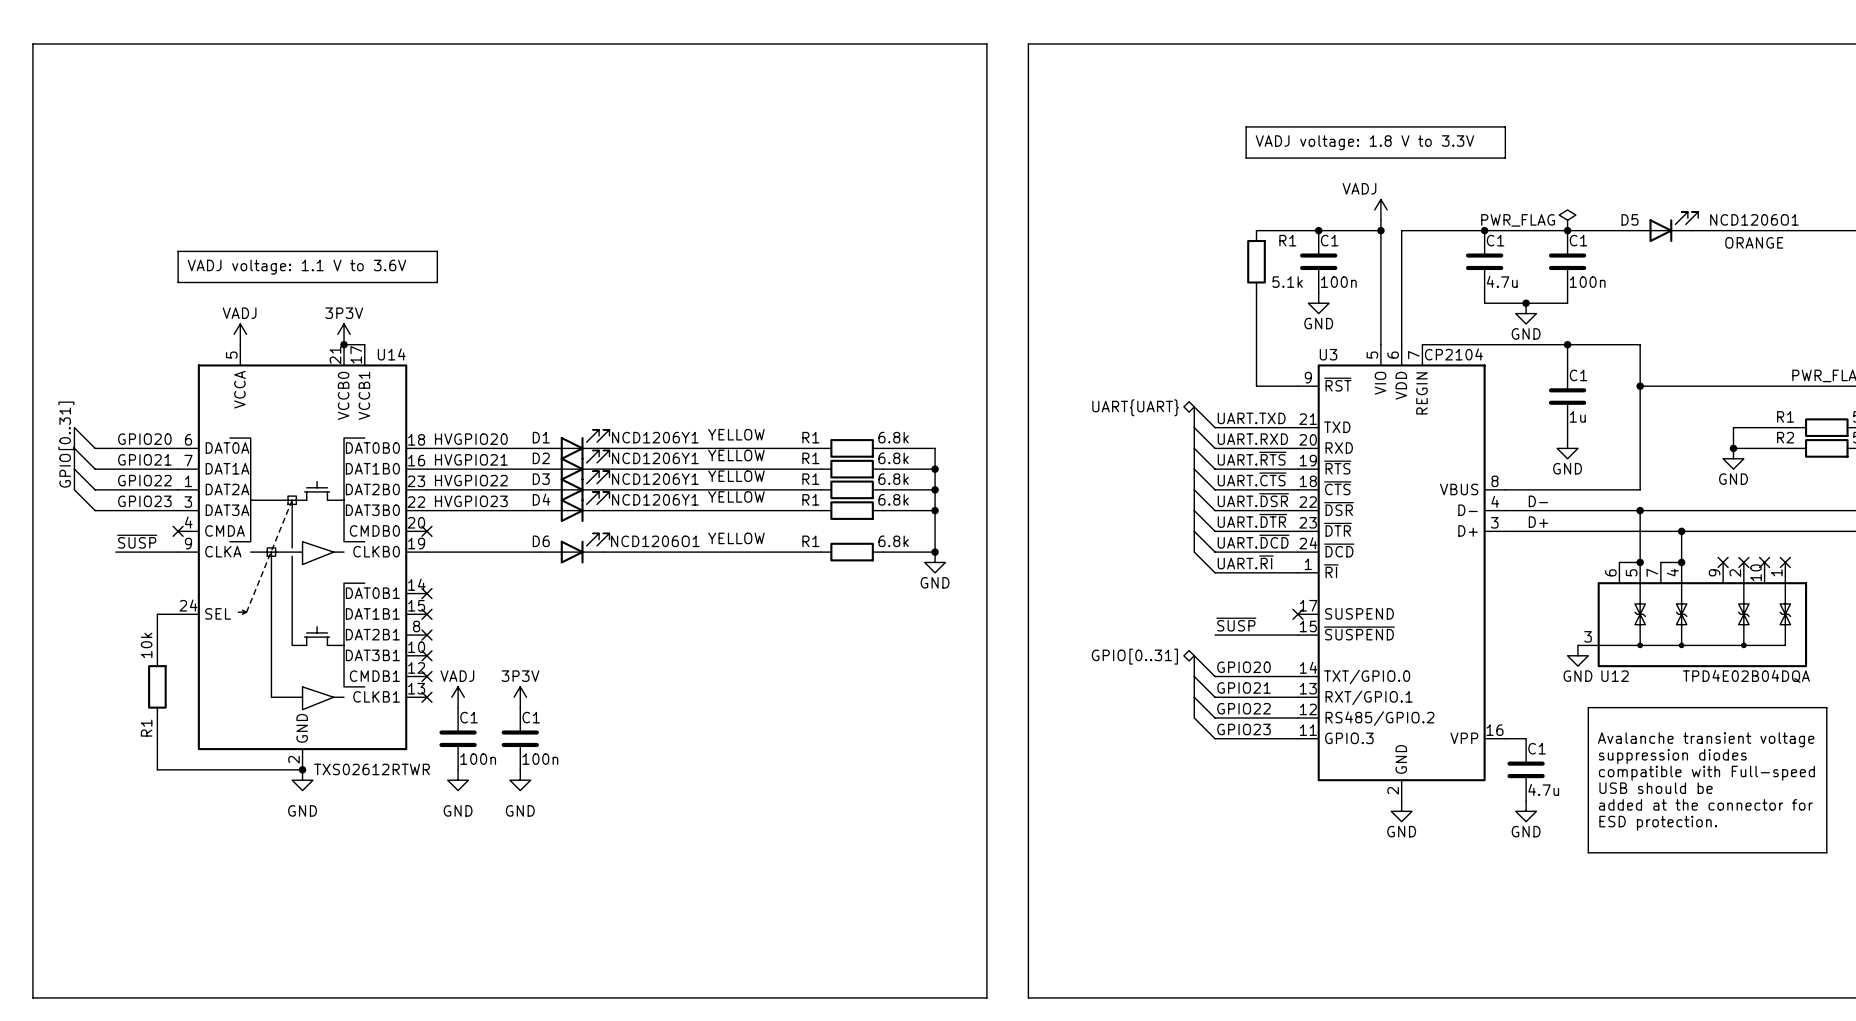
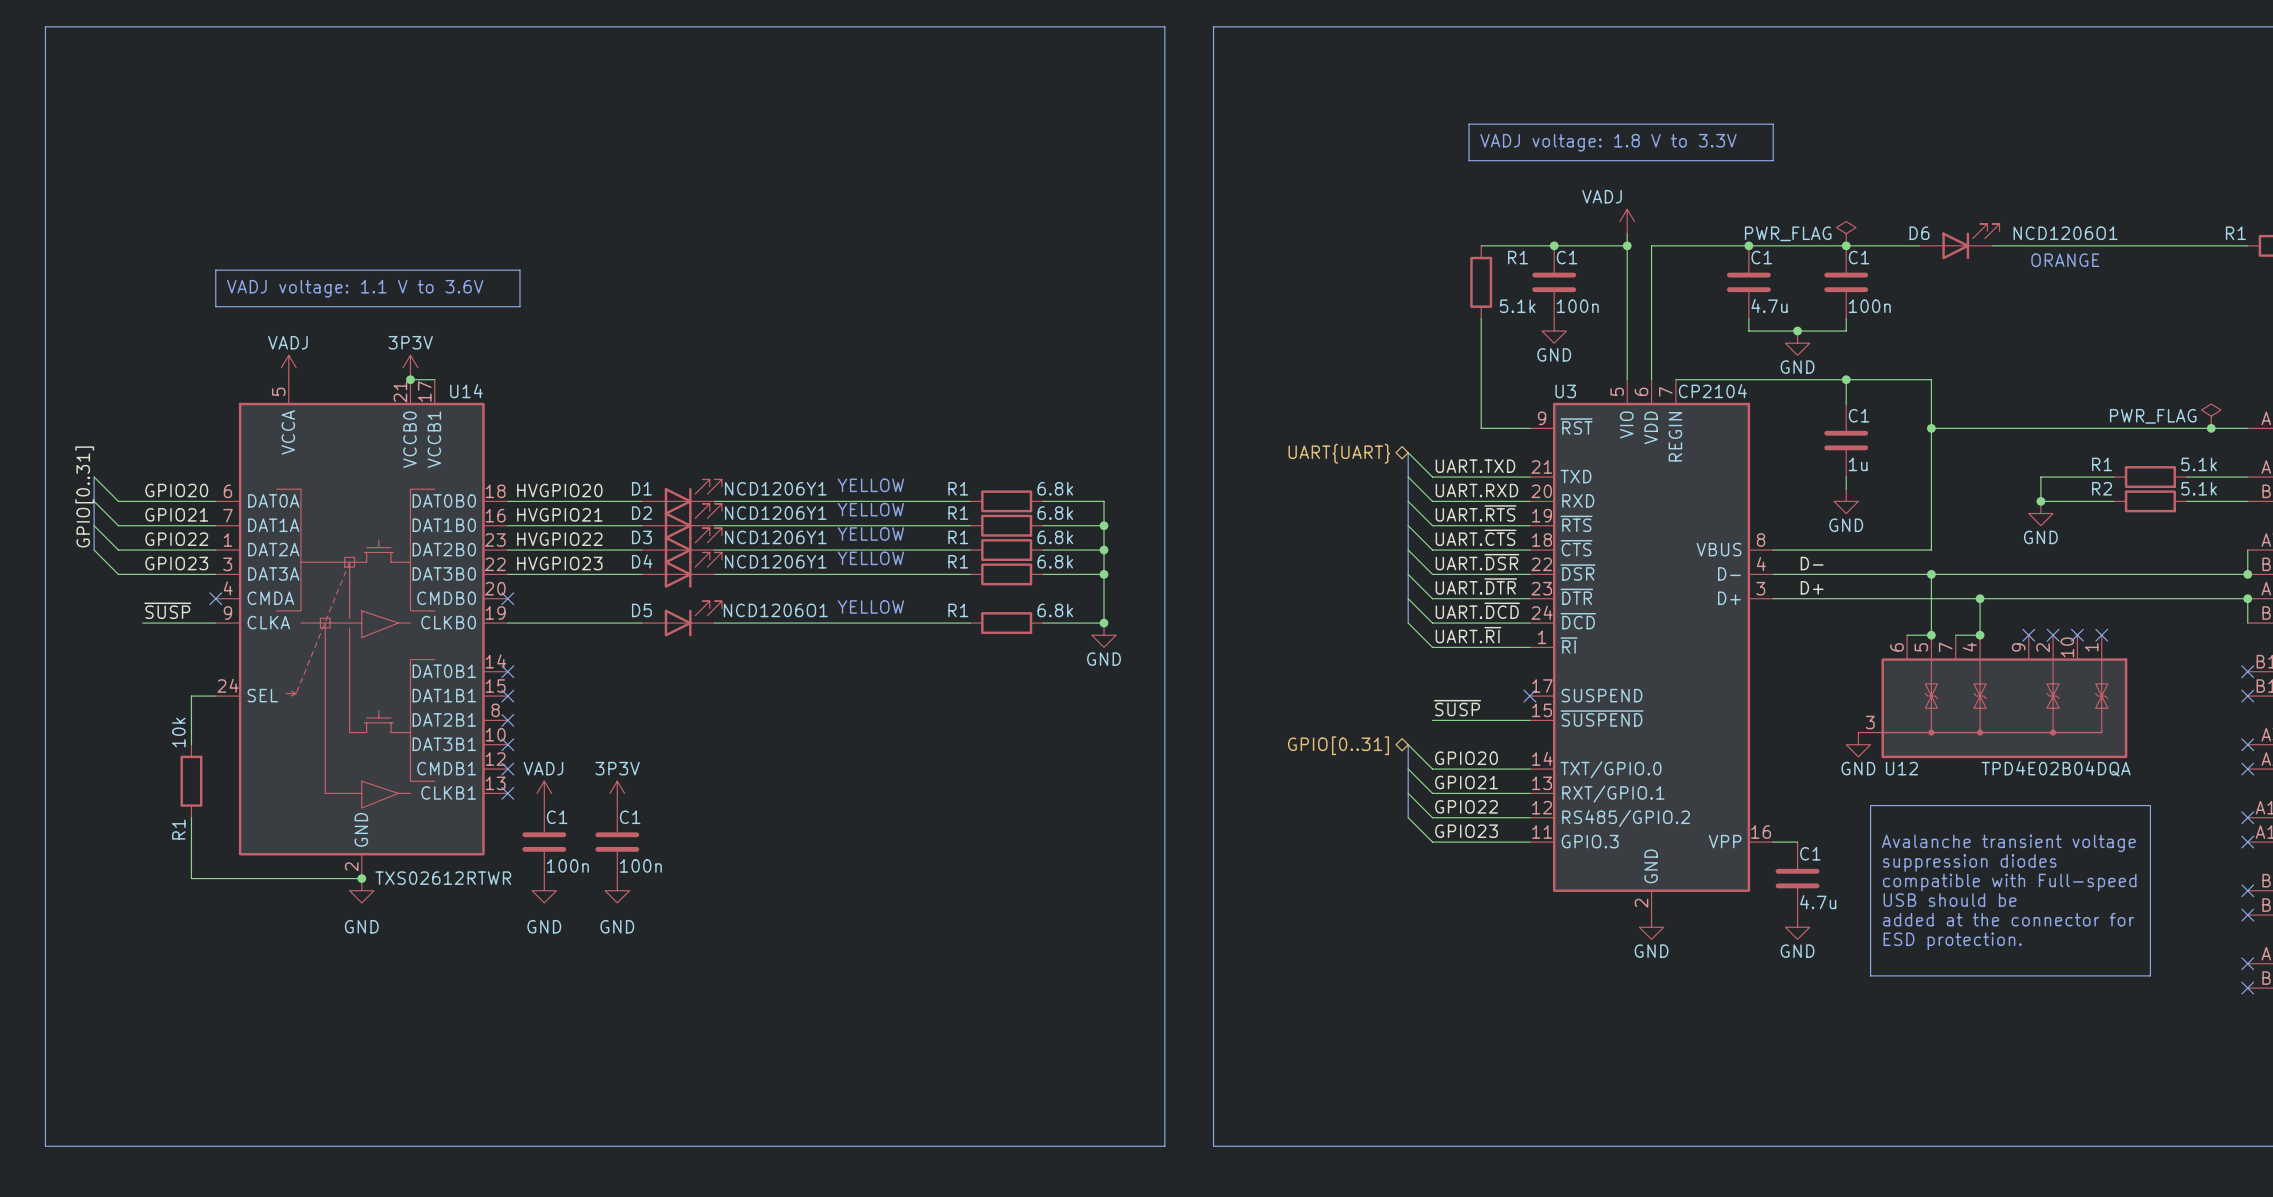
D5 name: D5 (1630, 219) -> D6 (1919, 233)
D6 name: D6 (541, 541) -> D5 (641, 610)

